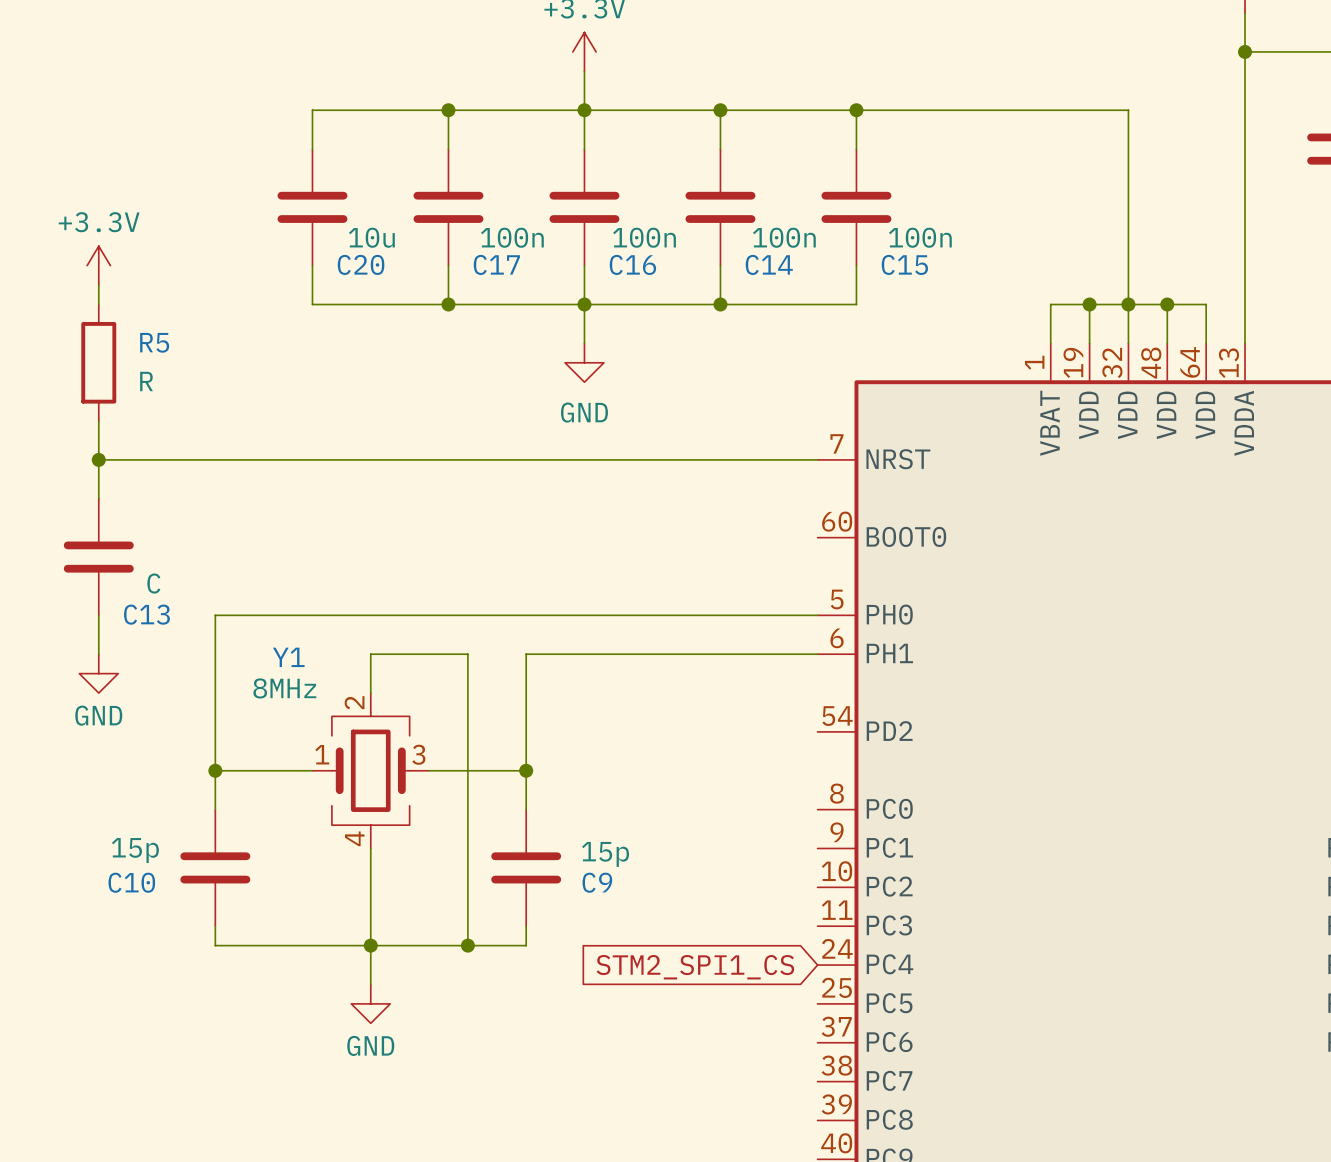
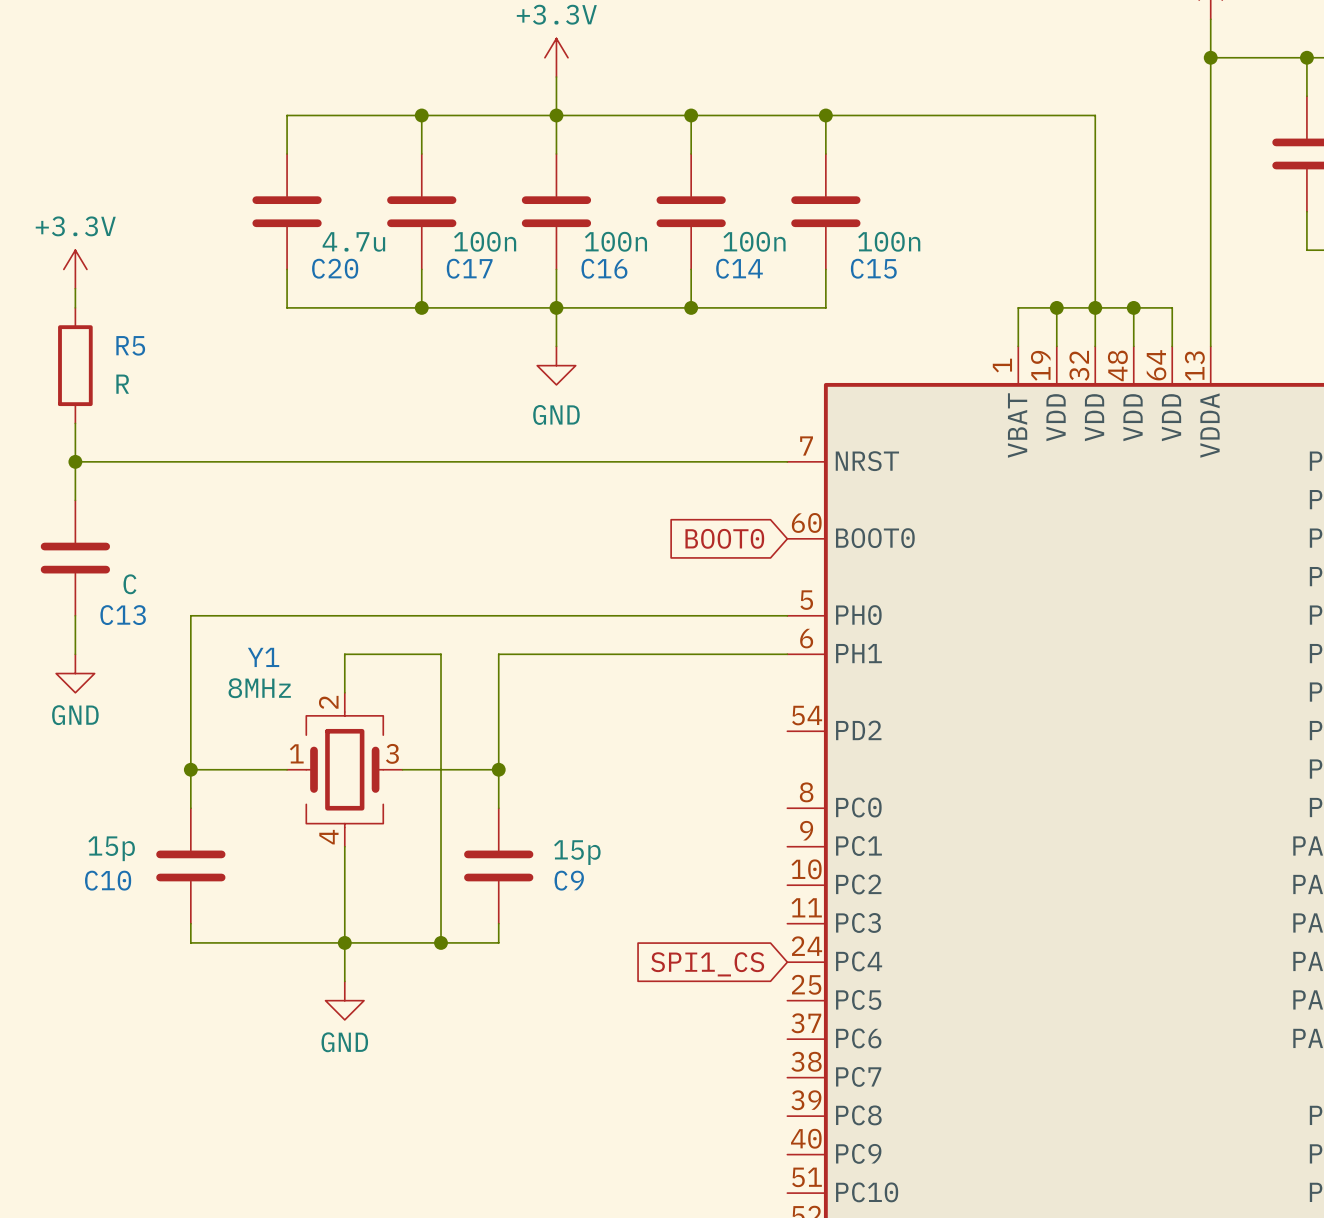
C20 value: 10u (371, 237) -> 4.7u (353, 241)
global label: none -> BOOT0 (724, 538)
global label: STM2_SPI1_CS (695, 967) -> SPI1_CS (707, 964)

